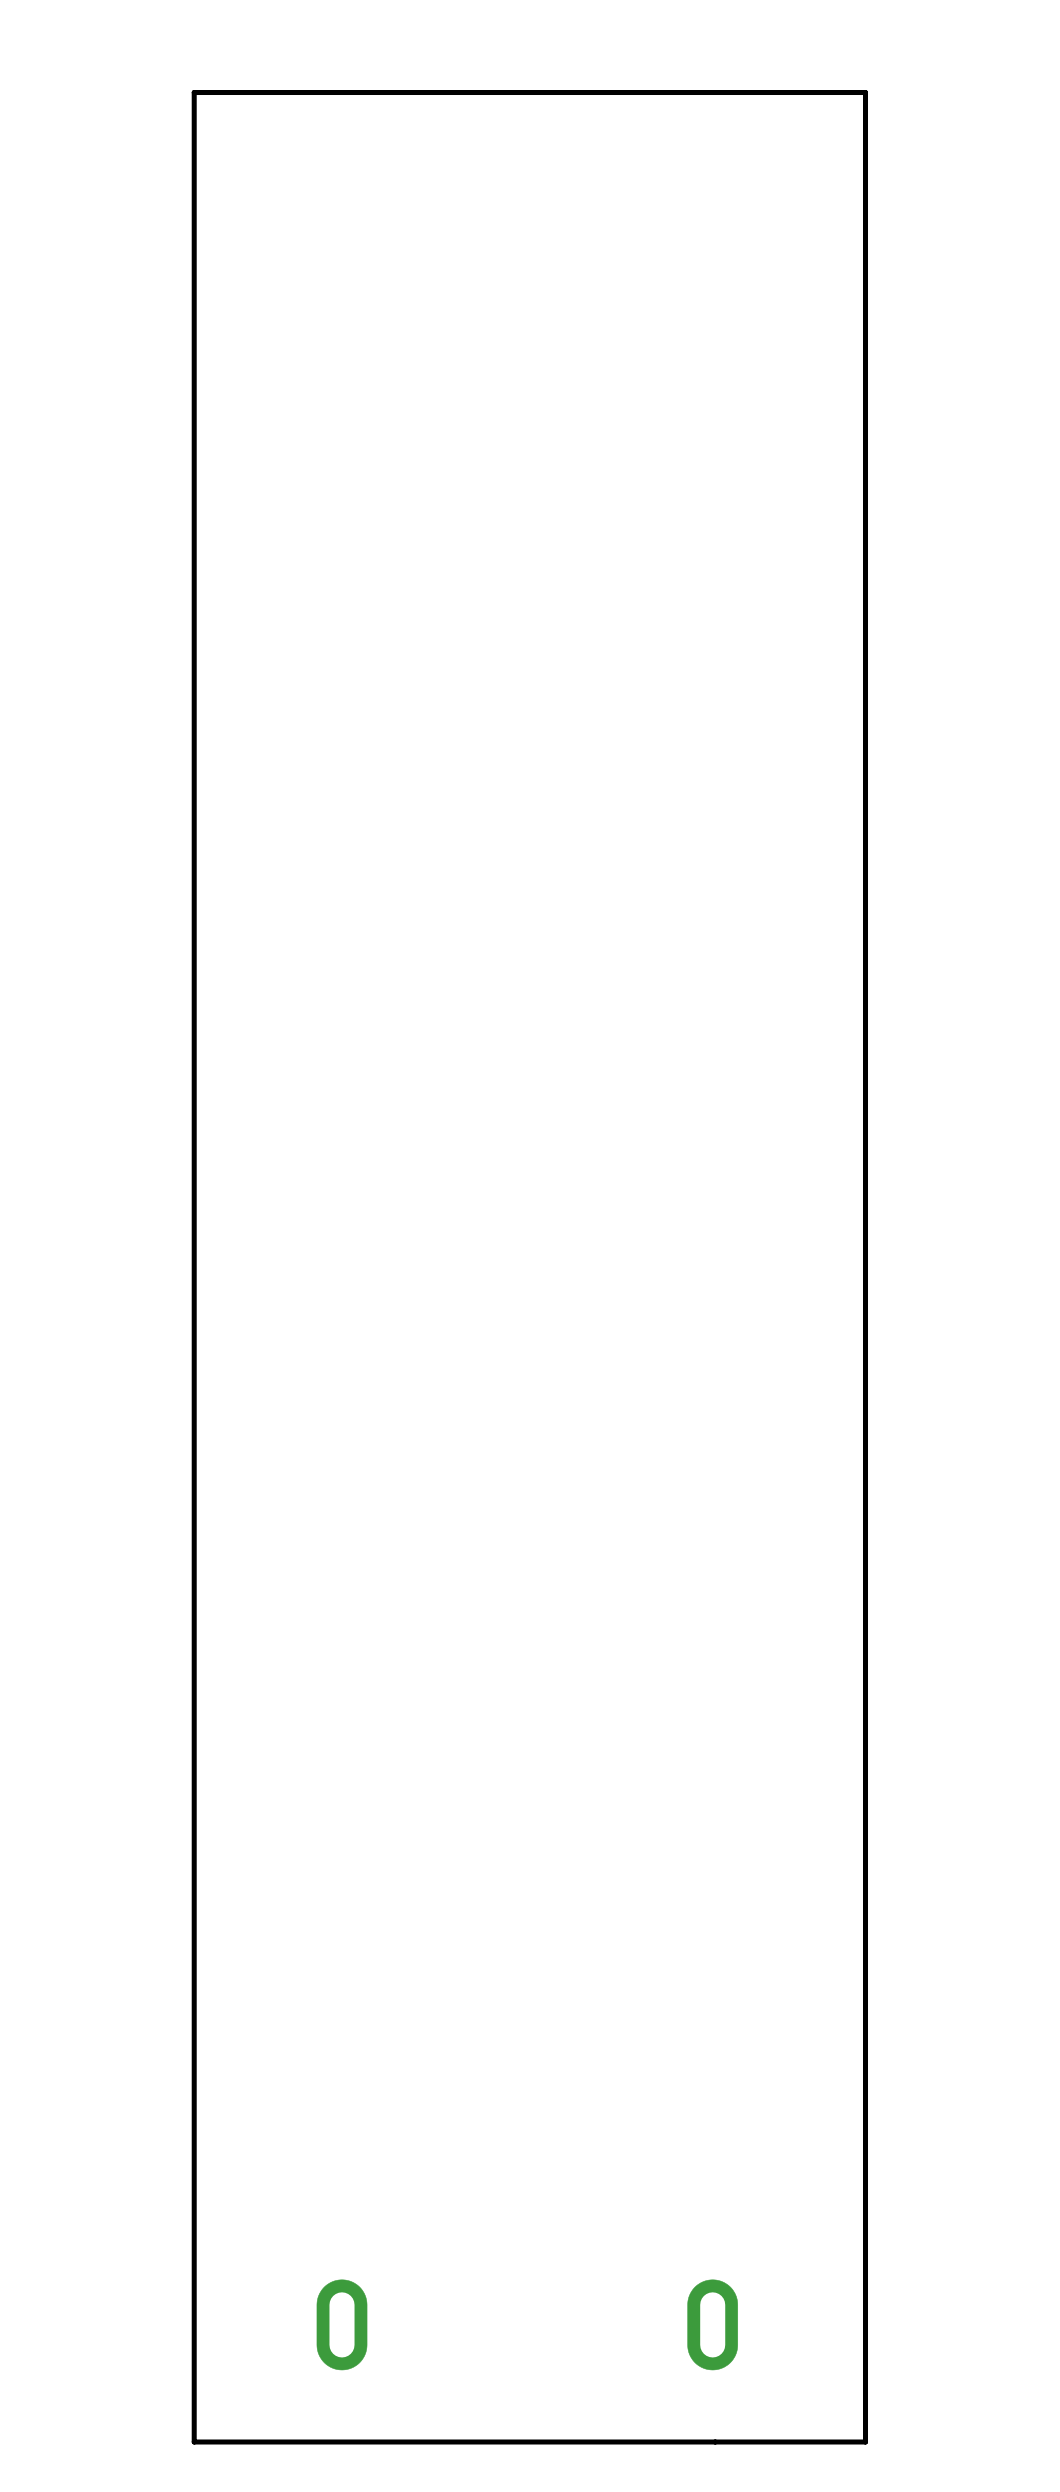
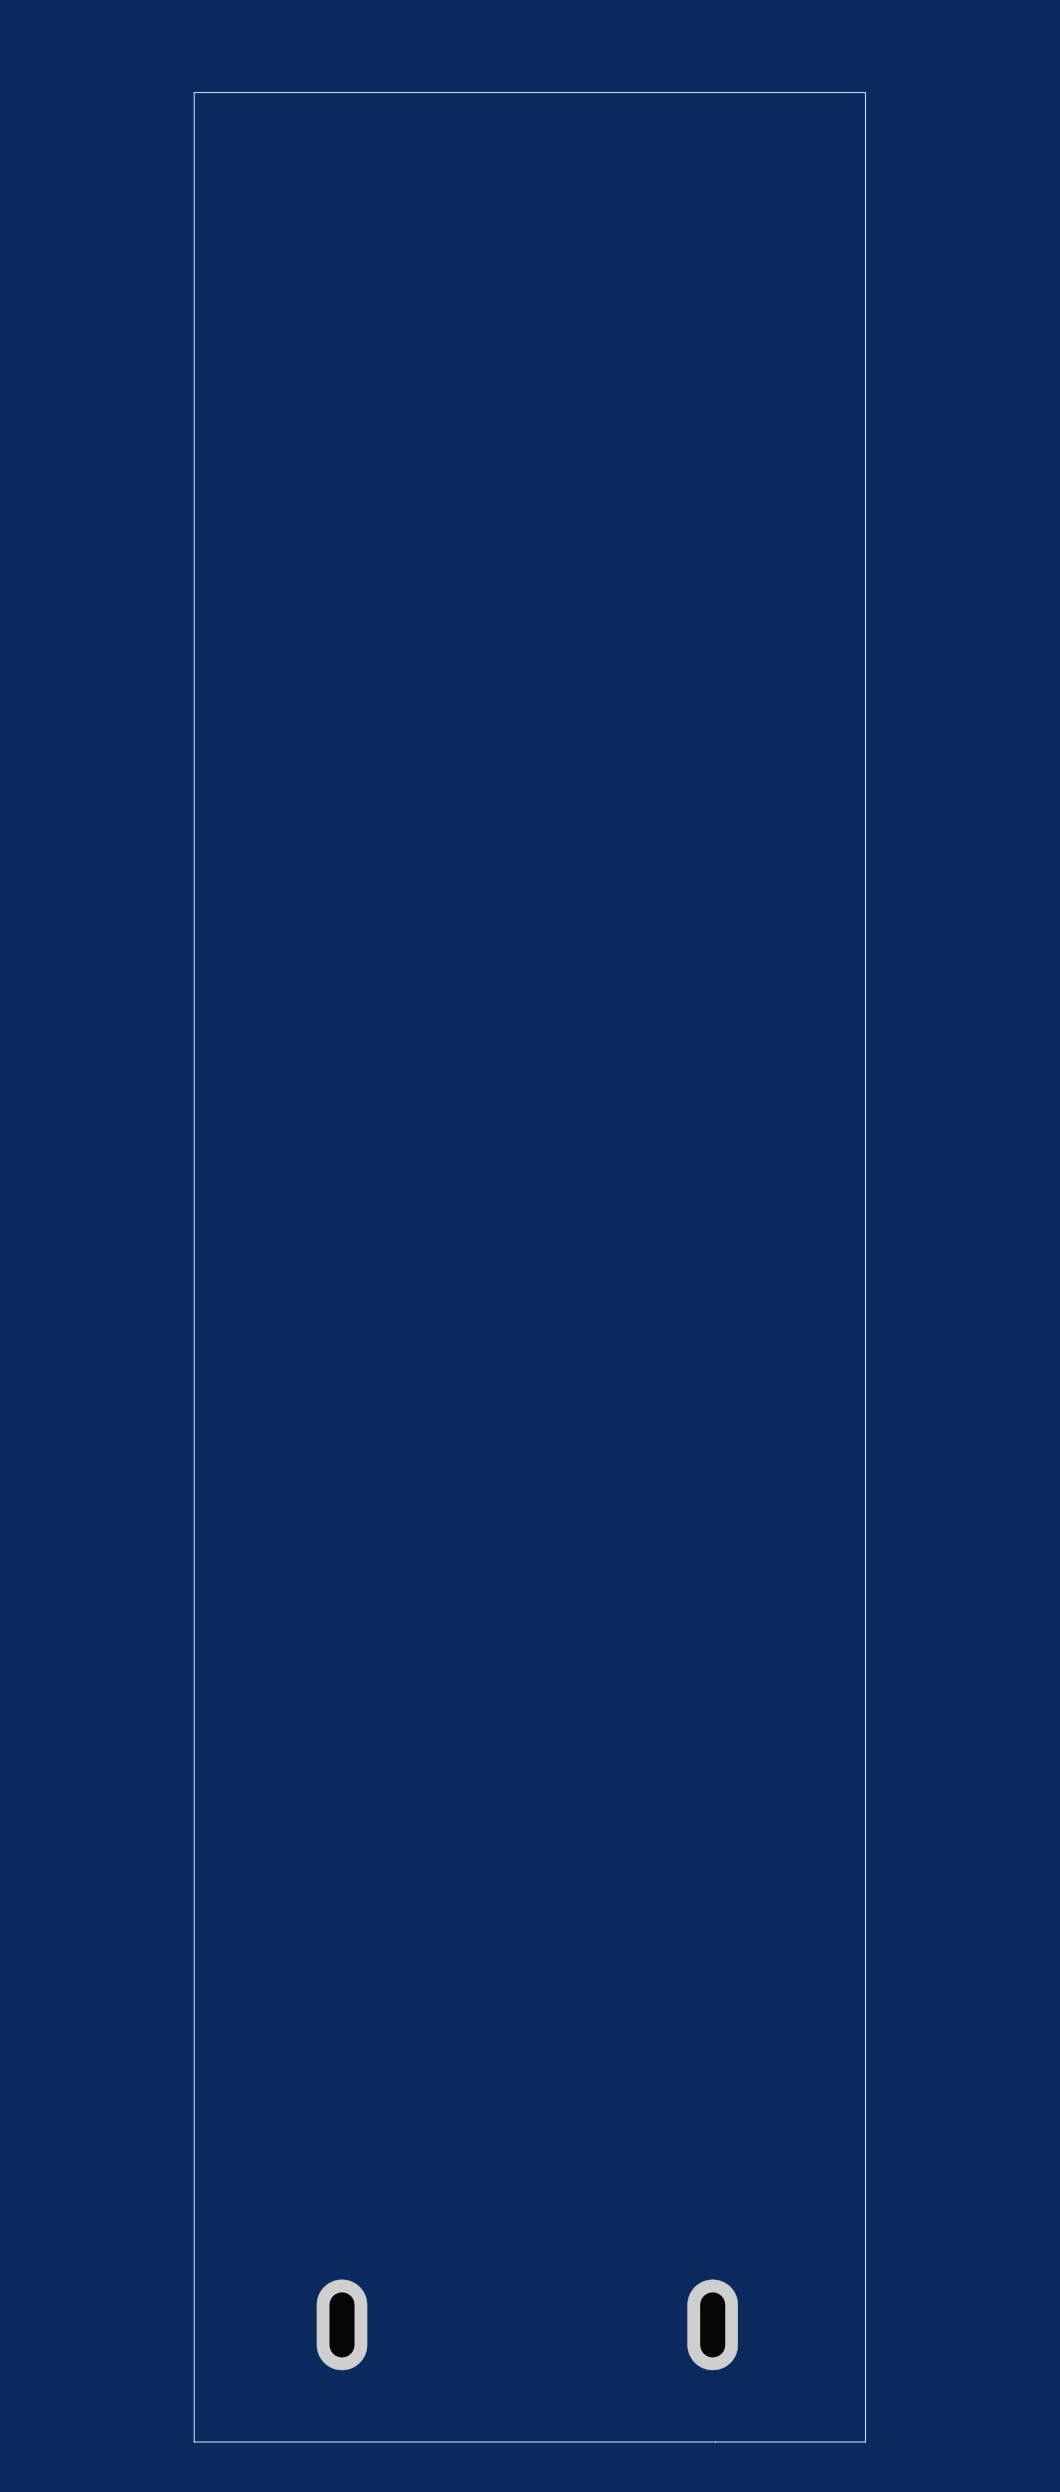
board edge width: thick (865, 92) (865, 2442) (194, 2442) (194, 92) (865, 92) -> thin (865, 92) (865, 2442) (194, 2442) (194, 92) (865, 92)

